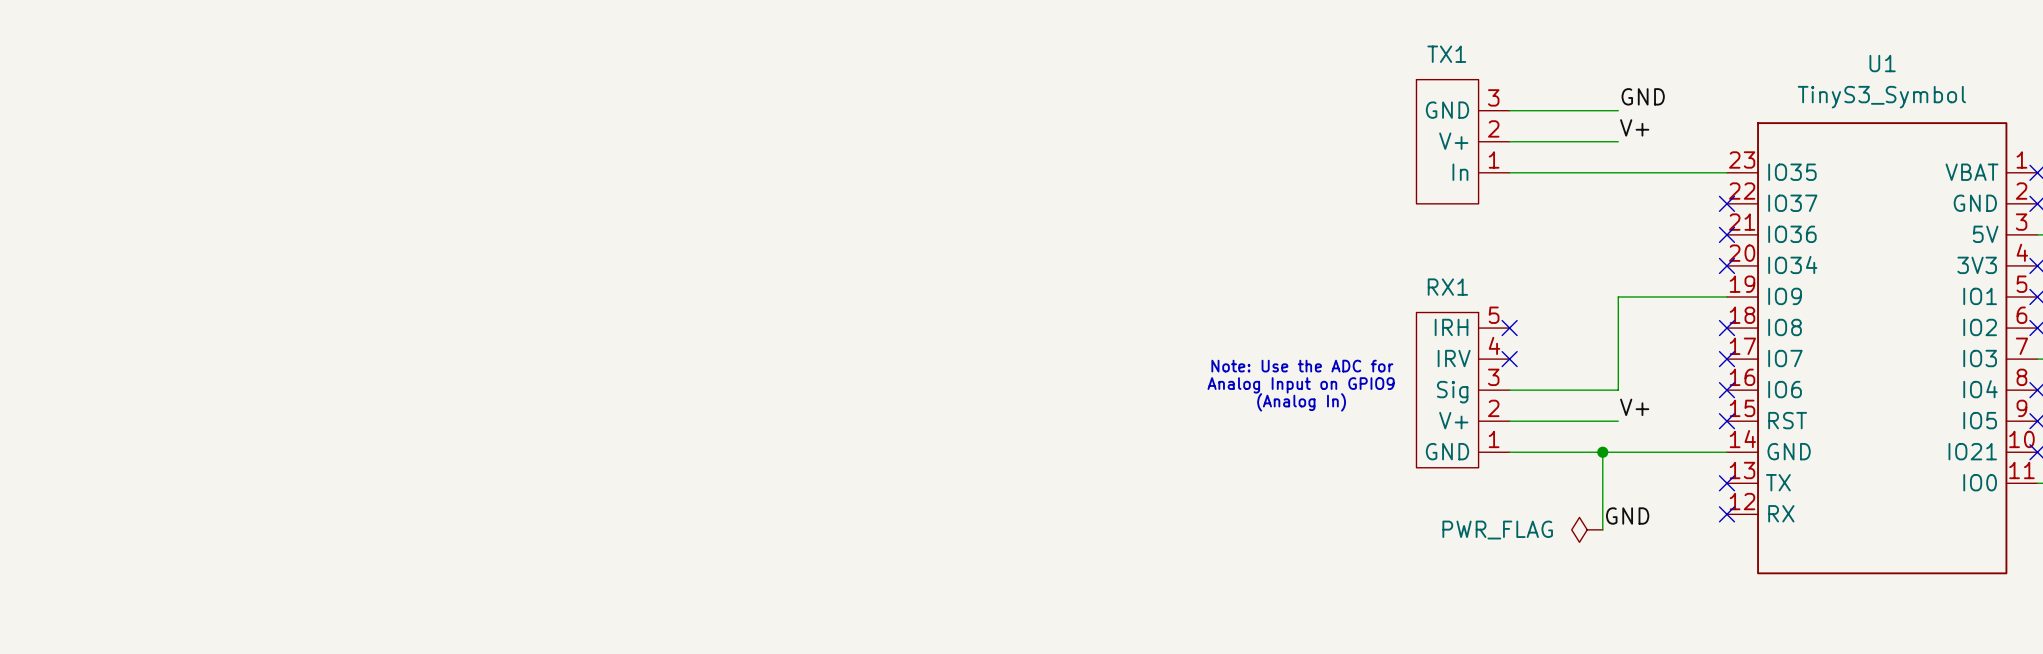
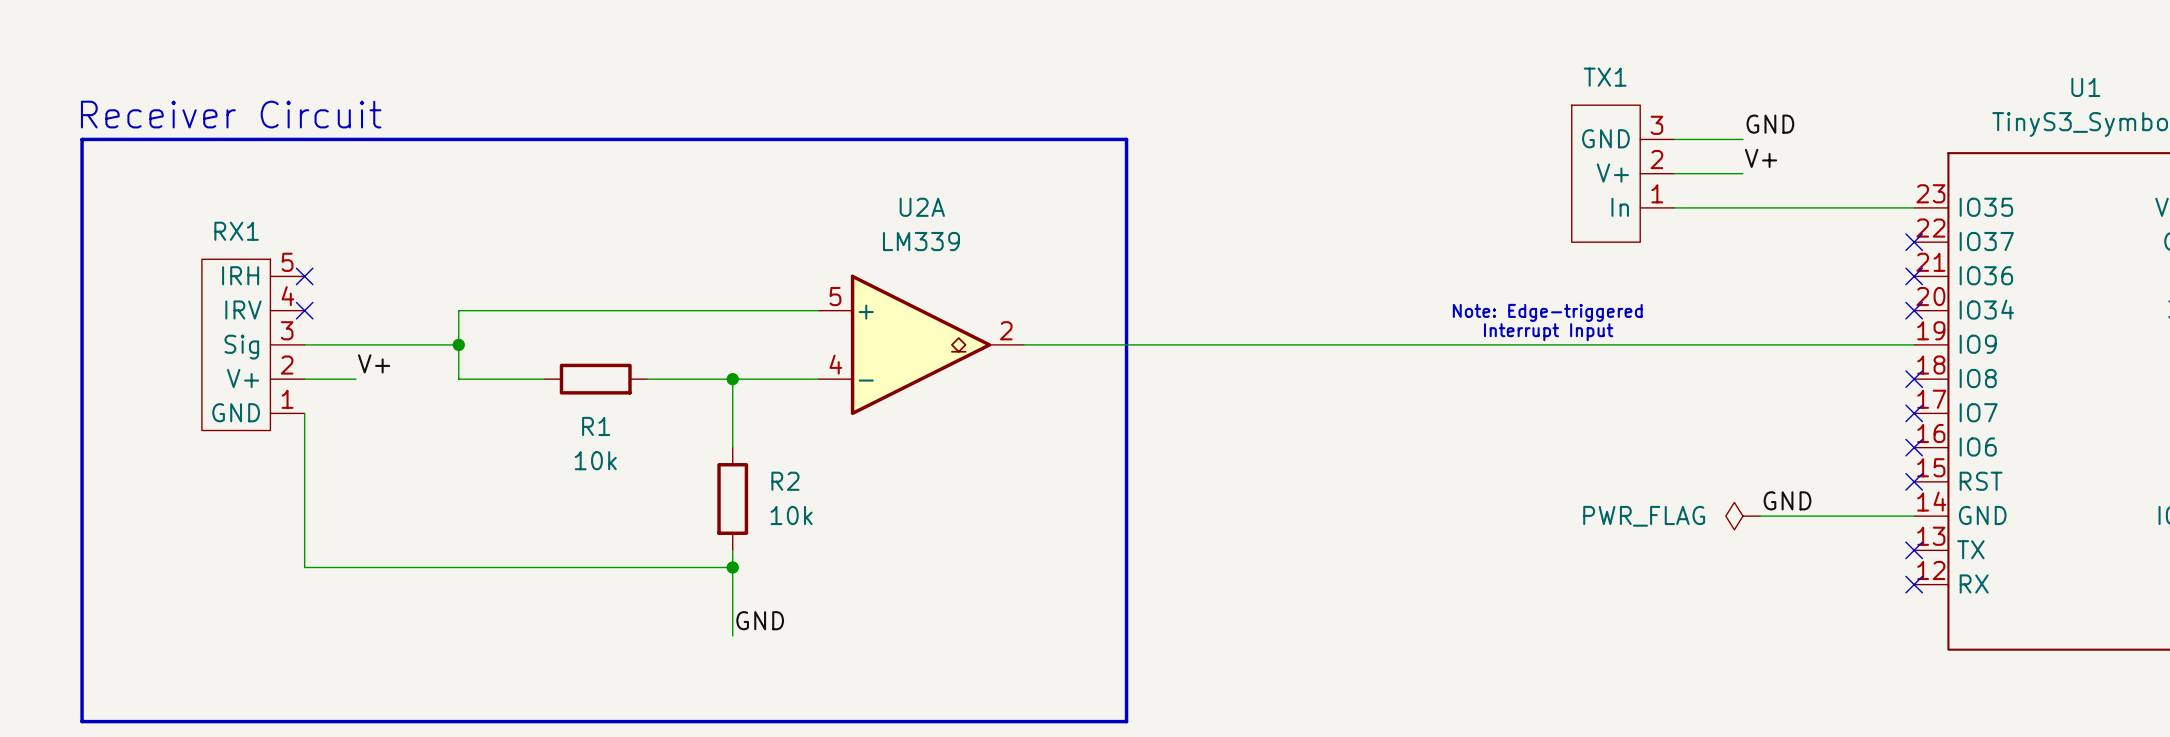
text: none -> Receiver Circuit (231, 114)
label position: GND (1643, 96) -> GND (1770, 124)
line: none -> (82, 139) (1126, 139) (1126, 721) (82, 721) (82, 139)
wire: (1571, 110) (1618, 110) -> none
label position: V+ (1634, 127) -> V+ (1761, 158)
wire: (1571, 141) (1618, 141) -> none
no-connect mark: none -> (304, 276)
no-connect mark: none -> (304, 310)
wire: none -> (818, 310) (458, 310) (458, 379) (544, 379)
text: none -> Note: Edge-triggered (1547, 312)
text: none -> Interrupt Input (1548, 332)
wire: none -> (304, 344) (458, 344)
junction: none -> (458, 344)
U2A: none -> LM339 (921, 344)
wire: (1618, 296) (1618, 390) (1509, 390) -> (1794, 344) (1023, 344)
label: none -> V+ (374, 363)
wire: none -> (304, 379) (356, 379)
R1: none -> 10k (595, 379)
wire: none -> (647, 379) (818, 379)
wire: none -> (732, 379) (732, 447)
junction: none -> (732, 379)
no-connect mark: (1509, 328) -> none
wire: none -> (304, 413) (304, 567) (732, 567)
no-connect mark: (1509, 359) -> none
text: Note: Use the ADC for (1302, 366) -> none
text: Analog Input on GPIO9 (1301, 385) -> none
RX1 position: (1463, 390) -> (253, 344)
text: (Analog In) (1301, 402) -> none
label: V+ (1634, 407) -> none
wire: (1509, 421) (1618, 421) -> none
R2: none -> 10k (732, 499)
wire: (1509, 452) (1587, 452) -> none
wire: (1602, 452) (1602, 529) -> none
junction: (1602, 452) -> none
wire: none -> (732, 550) (732, 635)
junction: none -> (732, 567)
label position: GND (1627, 516) -> GND (1787, 500)
power symbol position: PWR_FLAG (1587, 529) -> PWR_FLAG (1742, 516)
label: none -> GND (760, 620)

